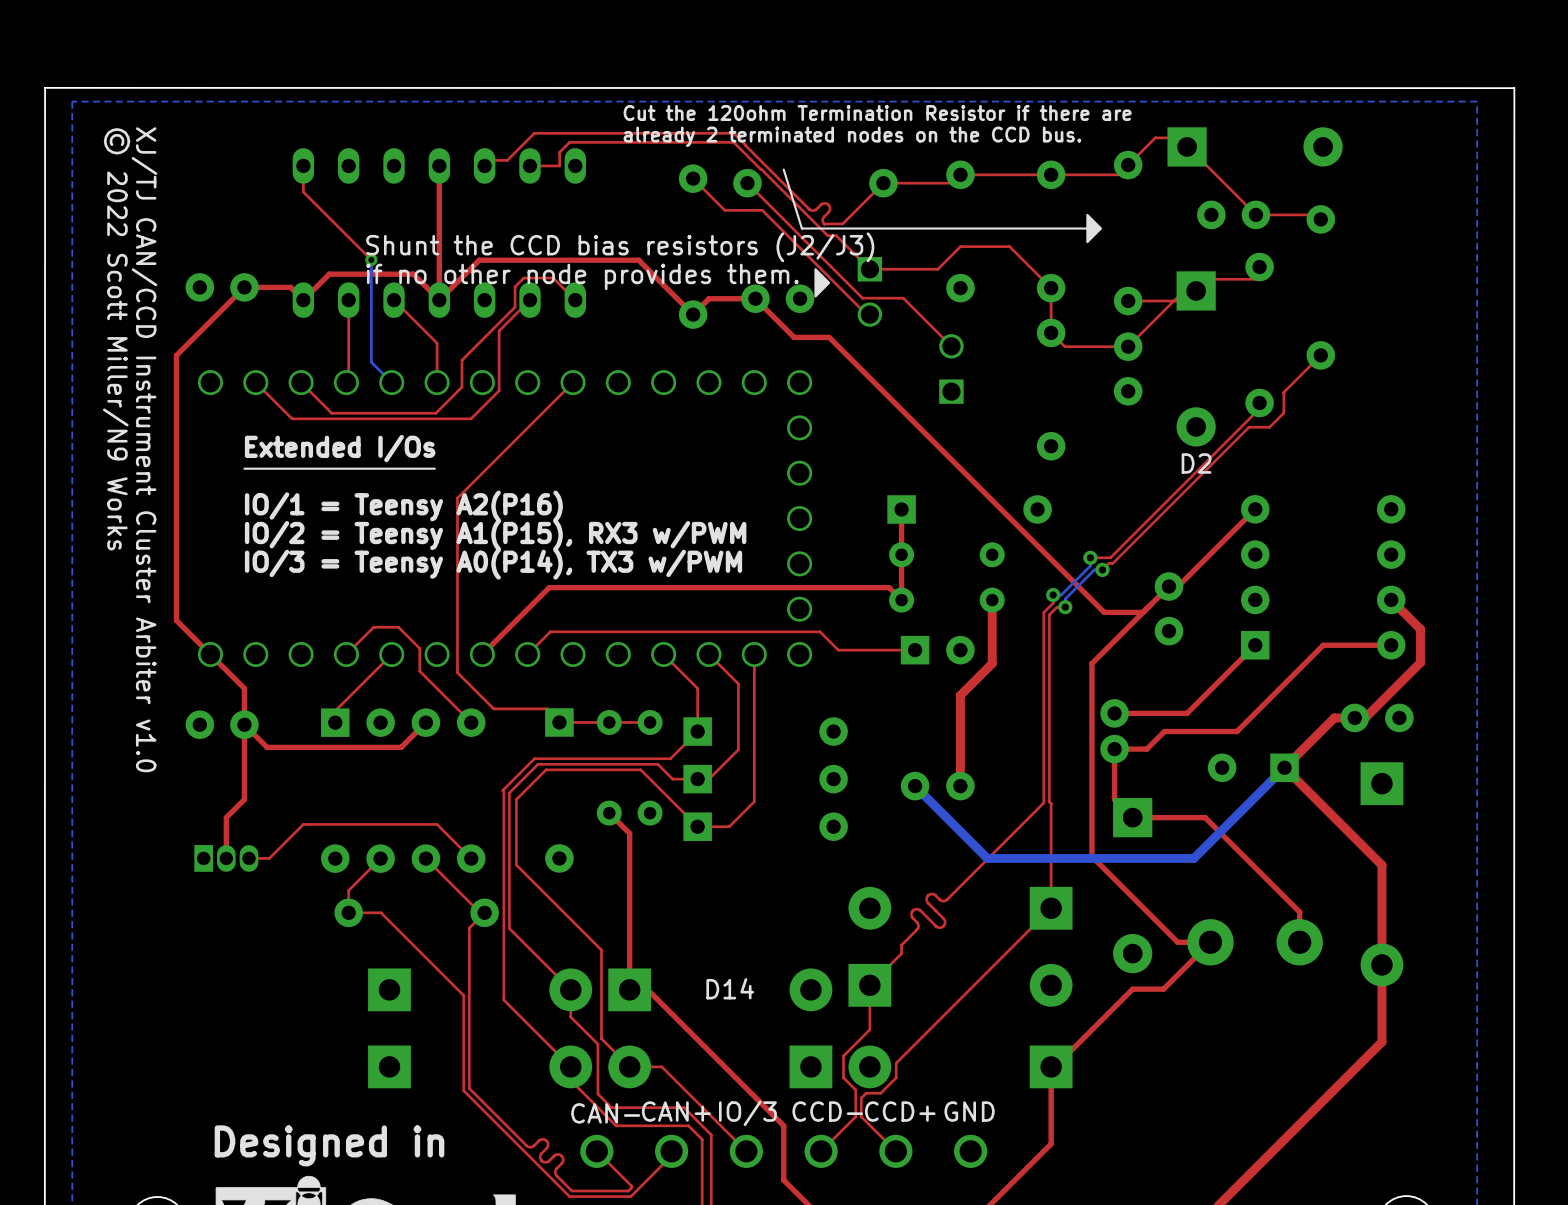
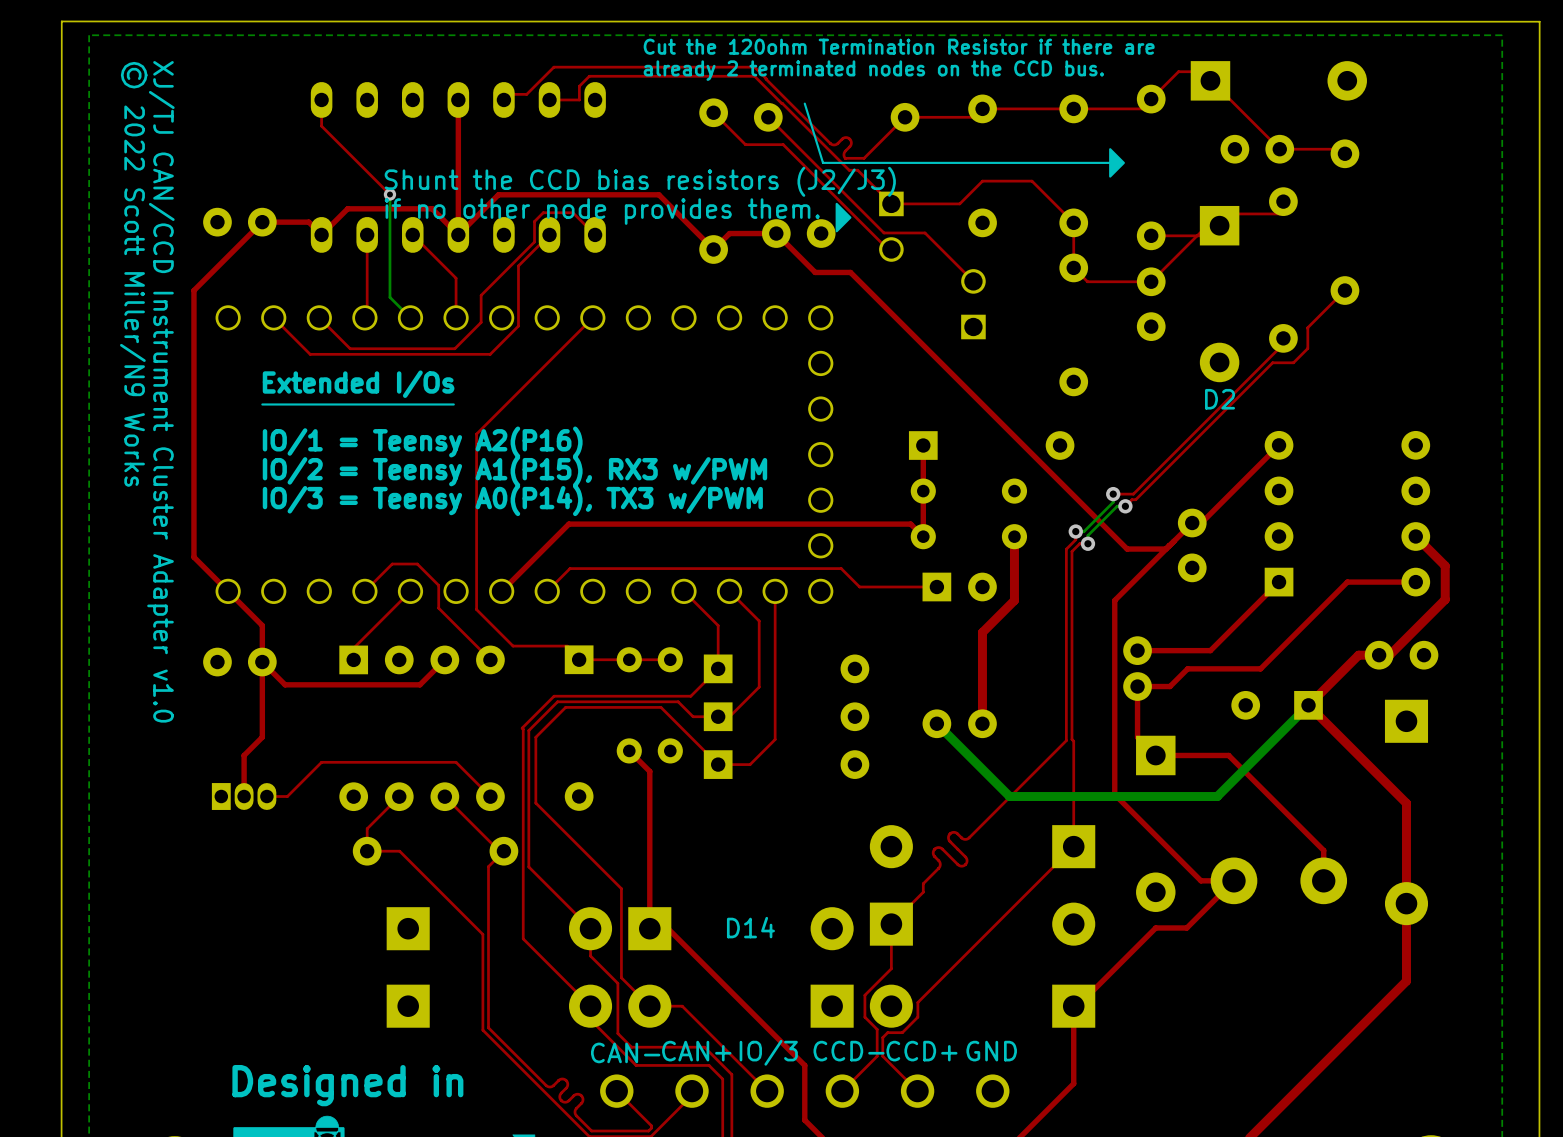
text: XJ/TJ CAN/CCD Instrument Cluster Arbiter v1.0 (144, 449) -> XJ/TJ CAN/CCD Instrument Cluster Adapter v1.0 (160, 391)

